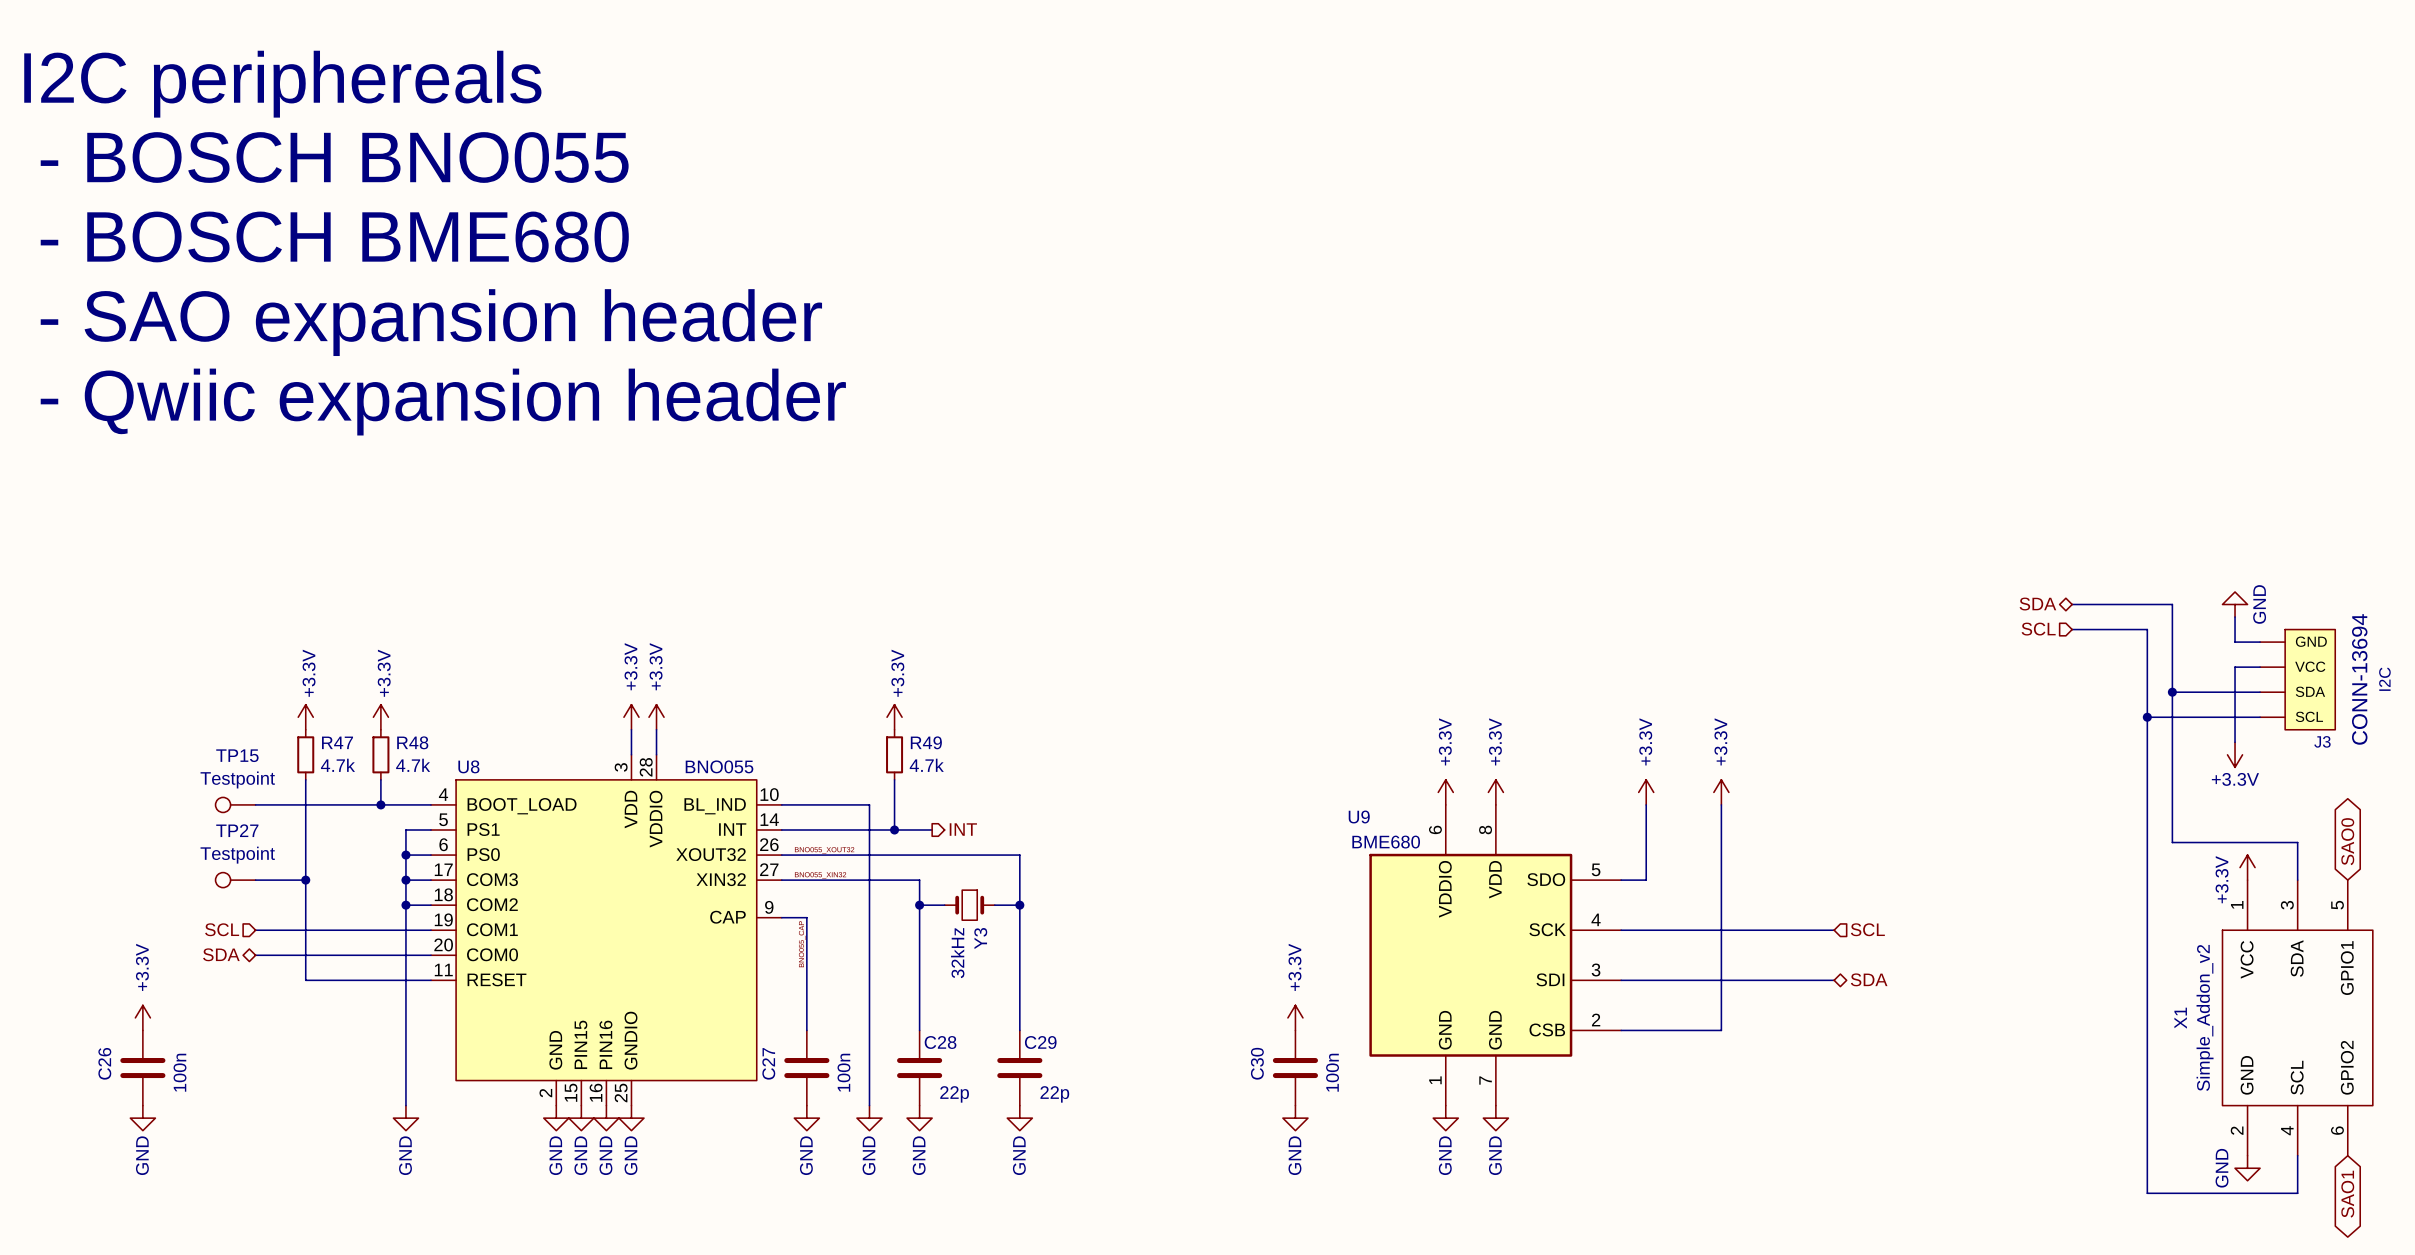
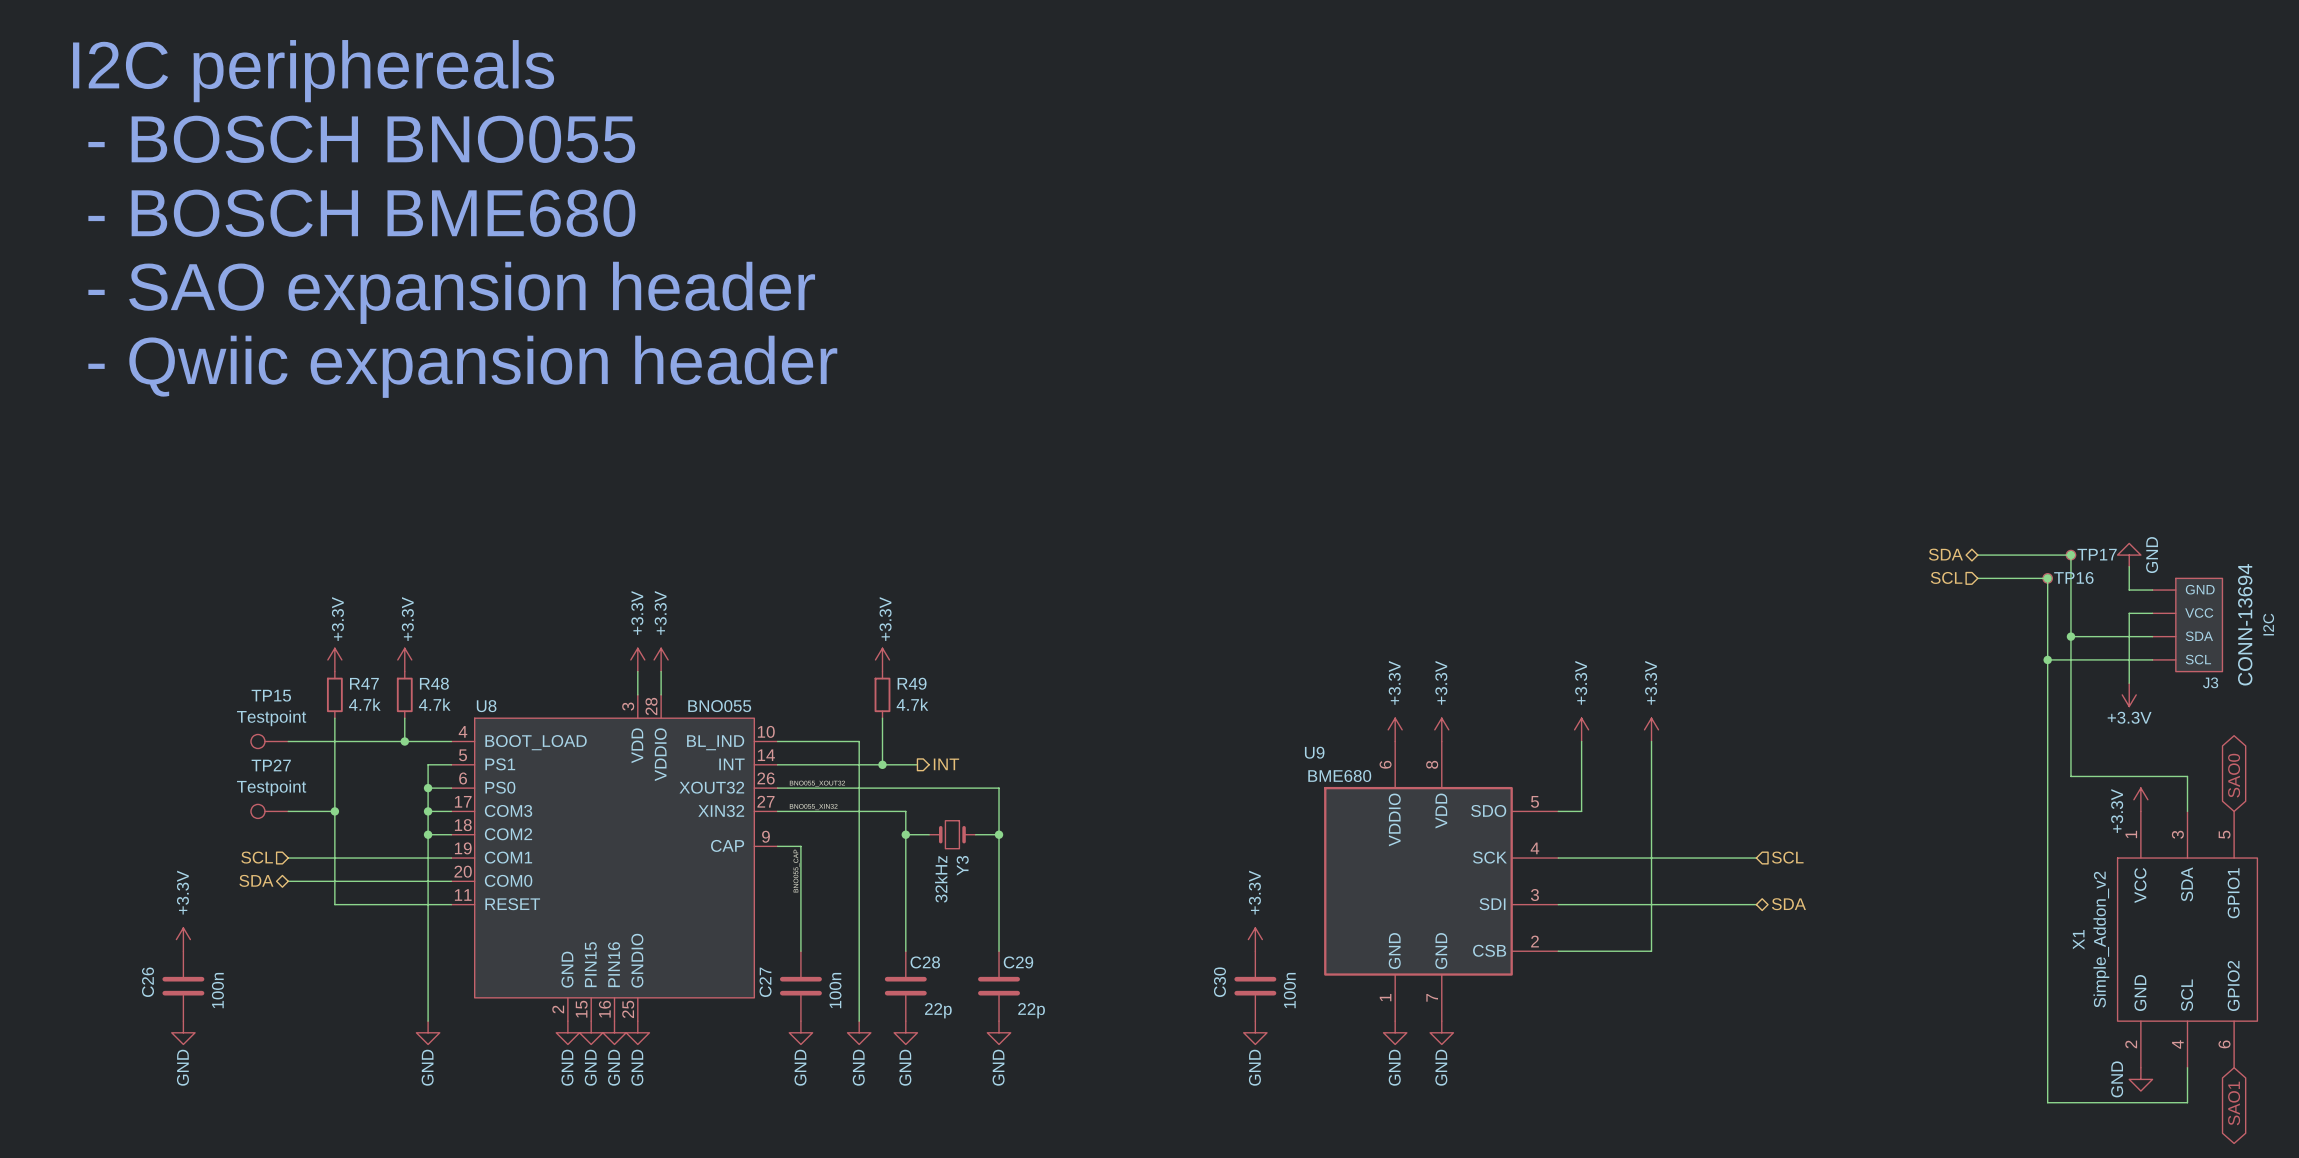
junction: none -> (2070, 555)
TP17: none -> (2070, 555)
junction: none -> (2047, 578)
TP16: none -> (2047, 578)

